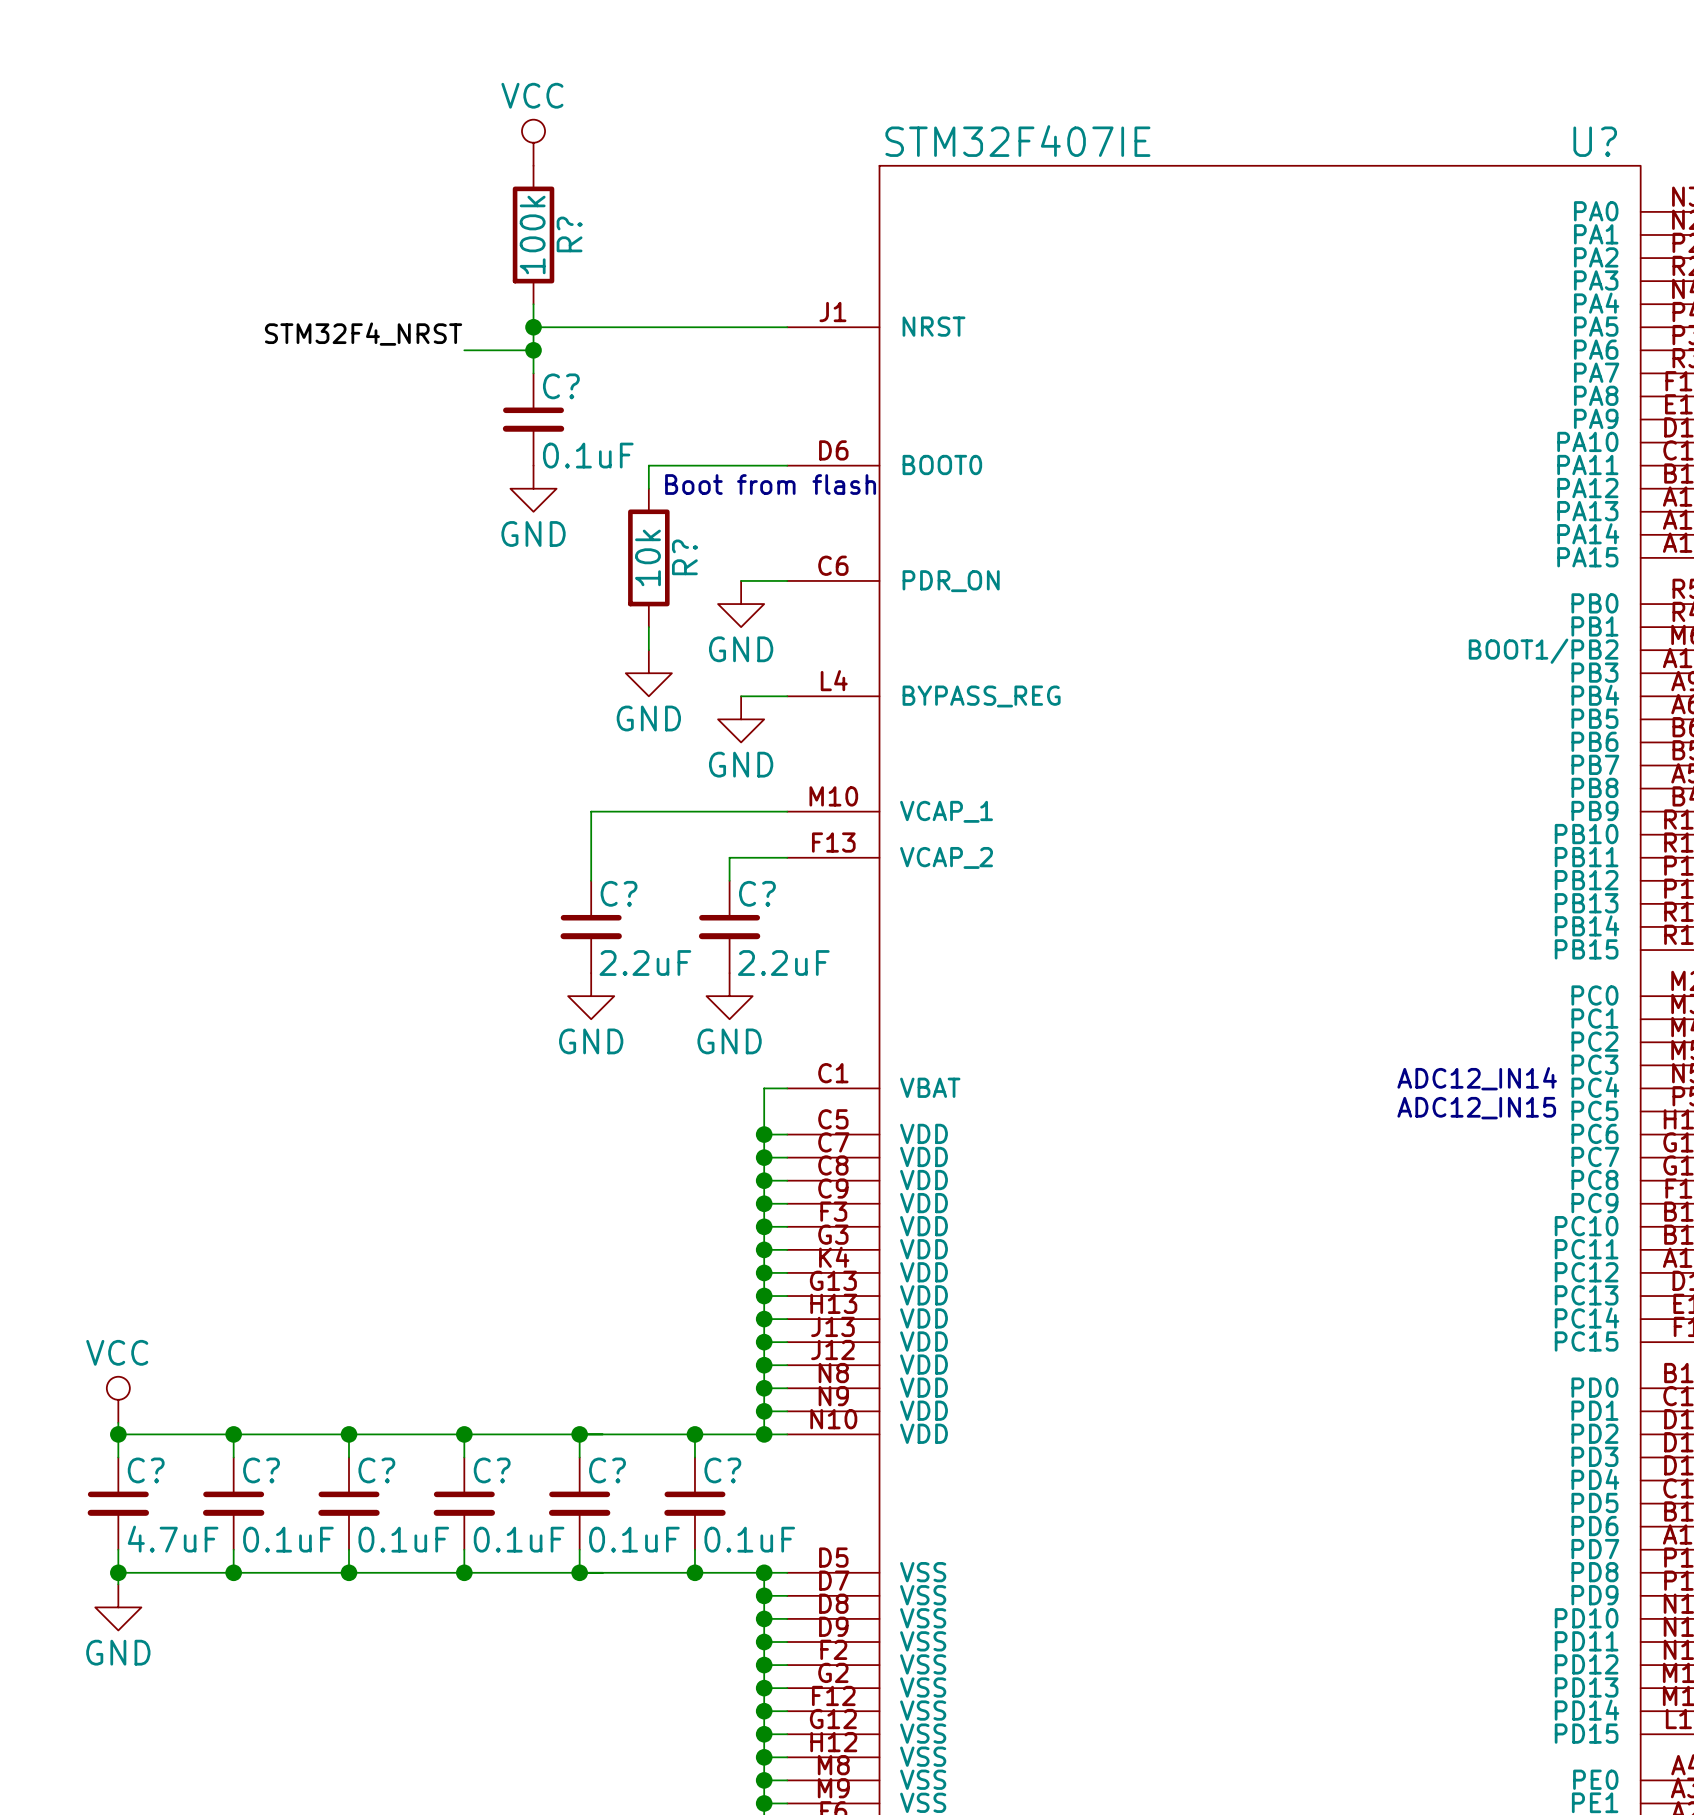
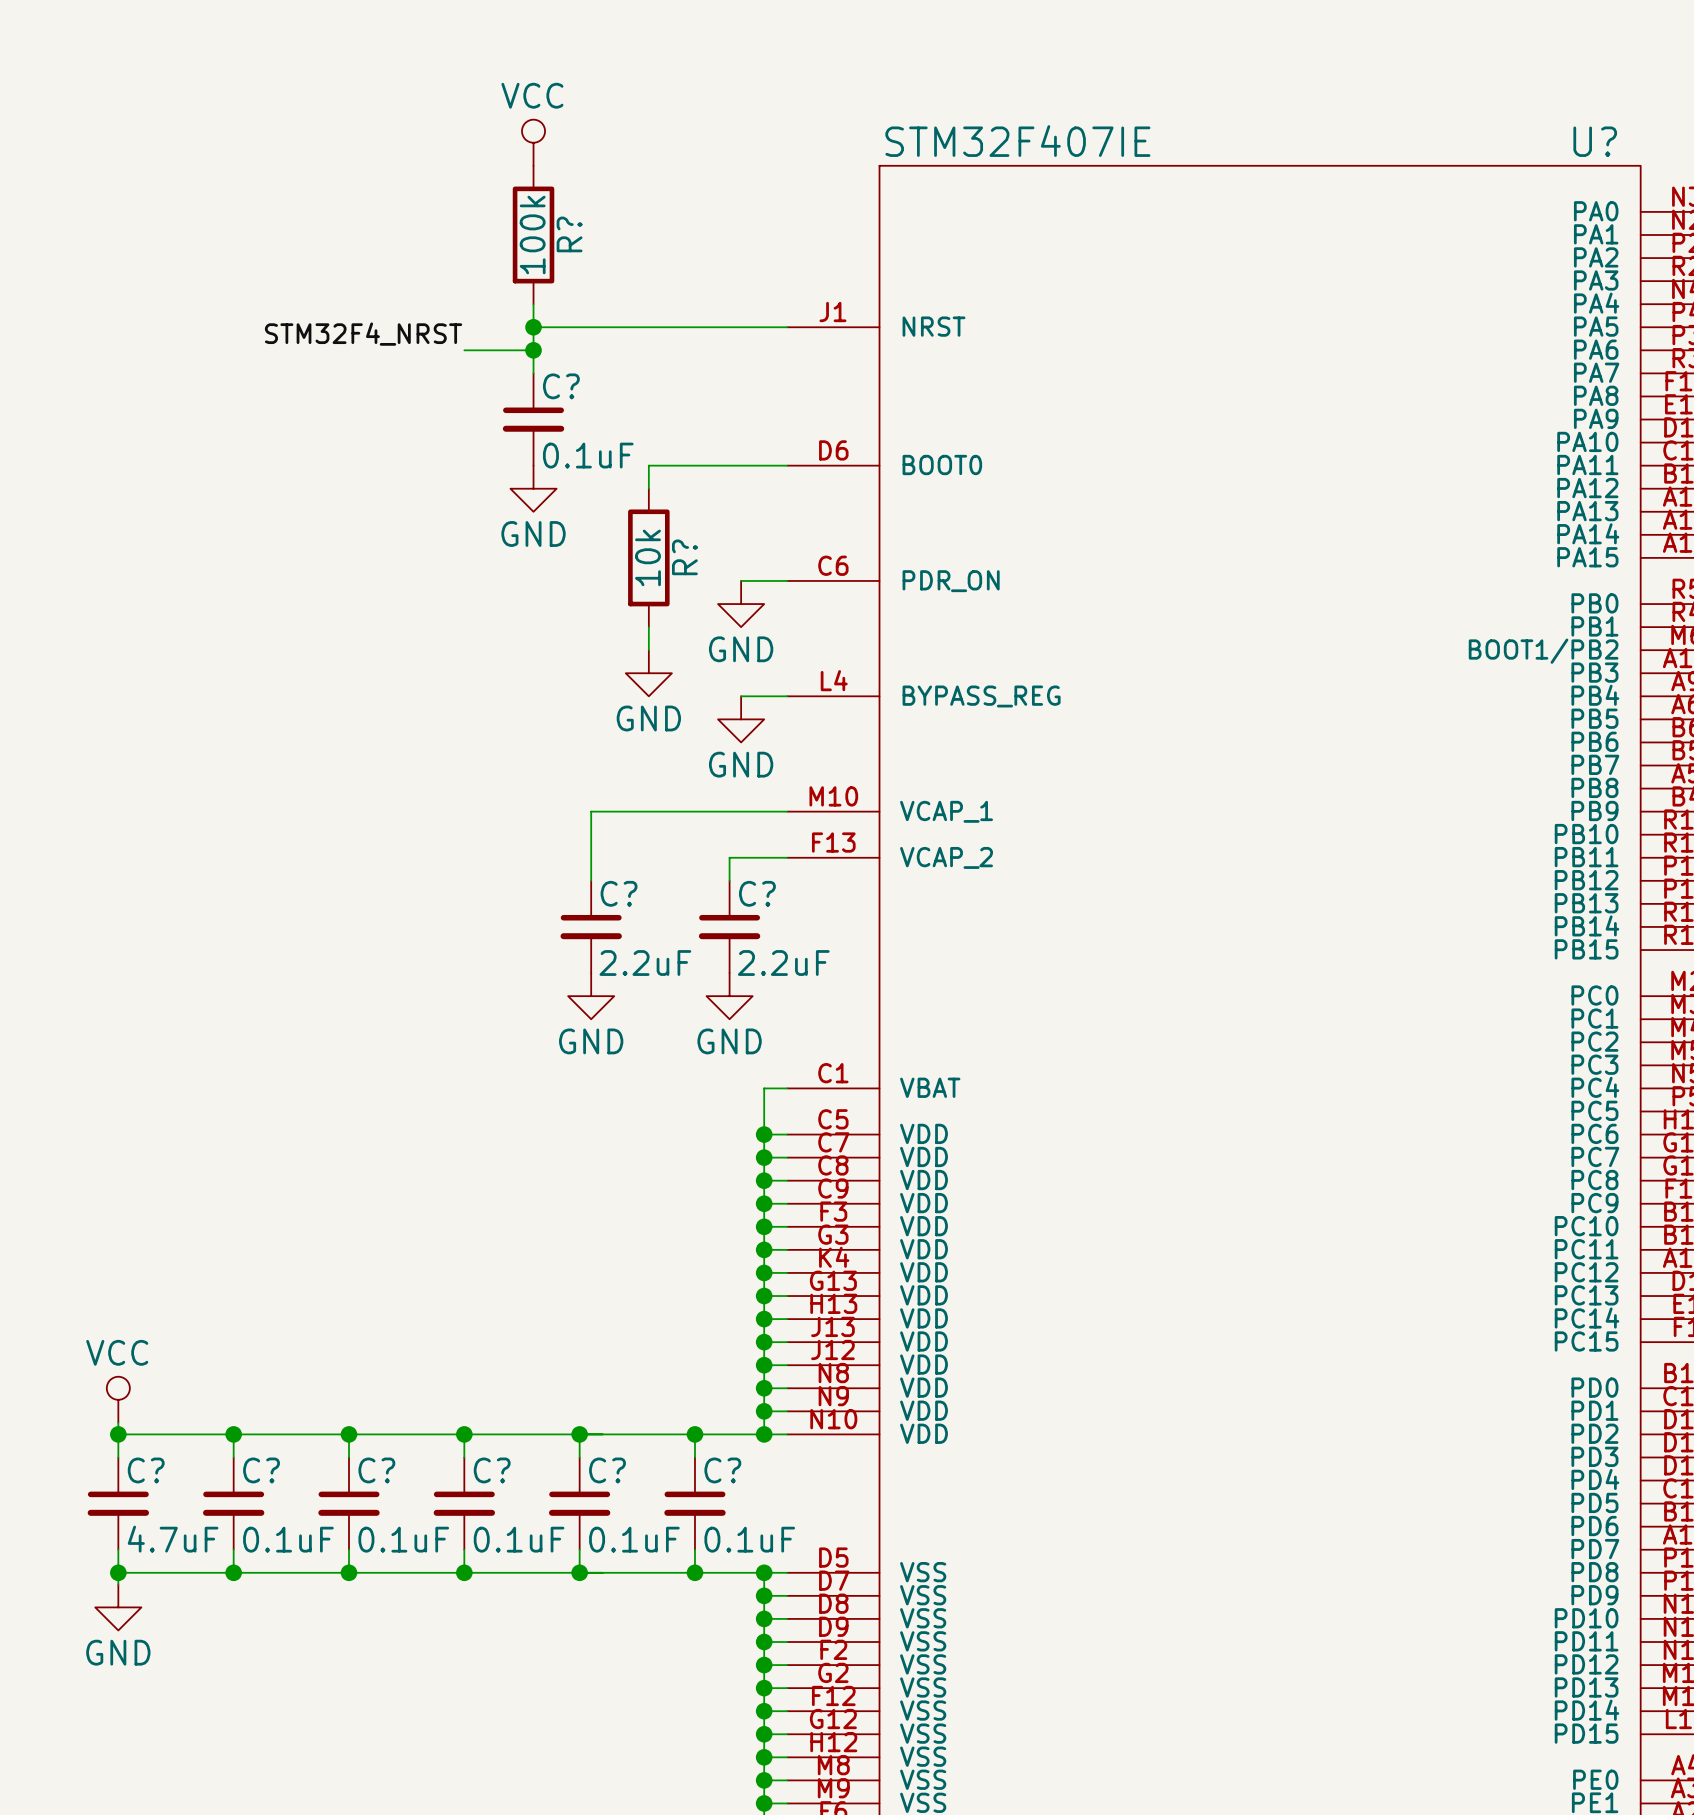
text: Boot from flash (770, 484) -> none
text: ADC12_IN14 (1477, 1078) -> none
text: ADC12_IN15 (1476, 1108) -> none

